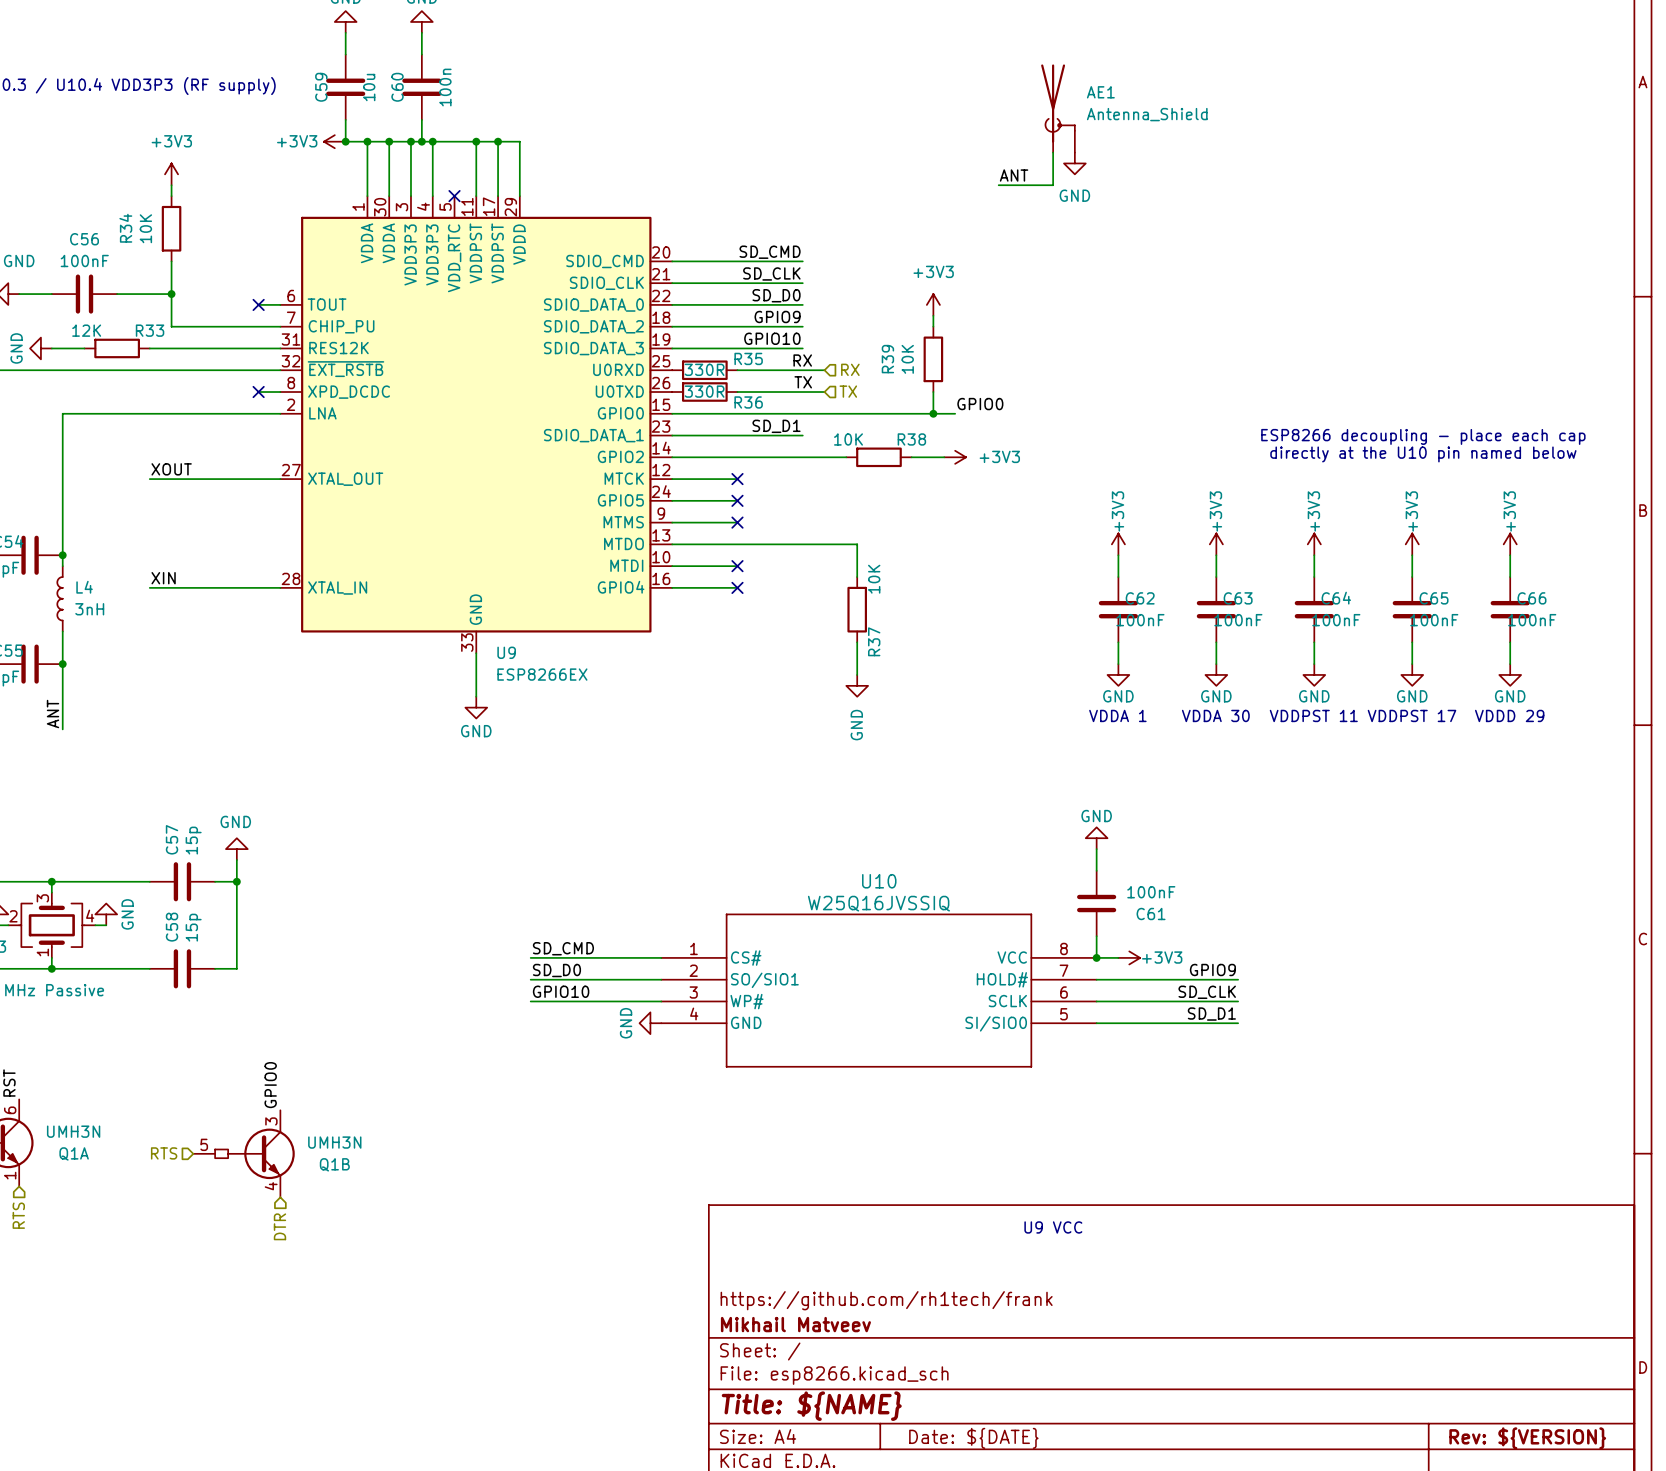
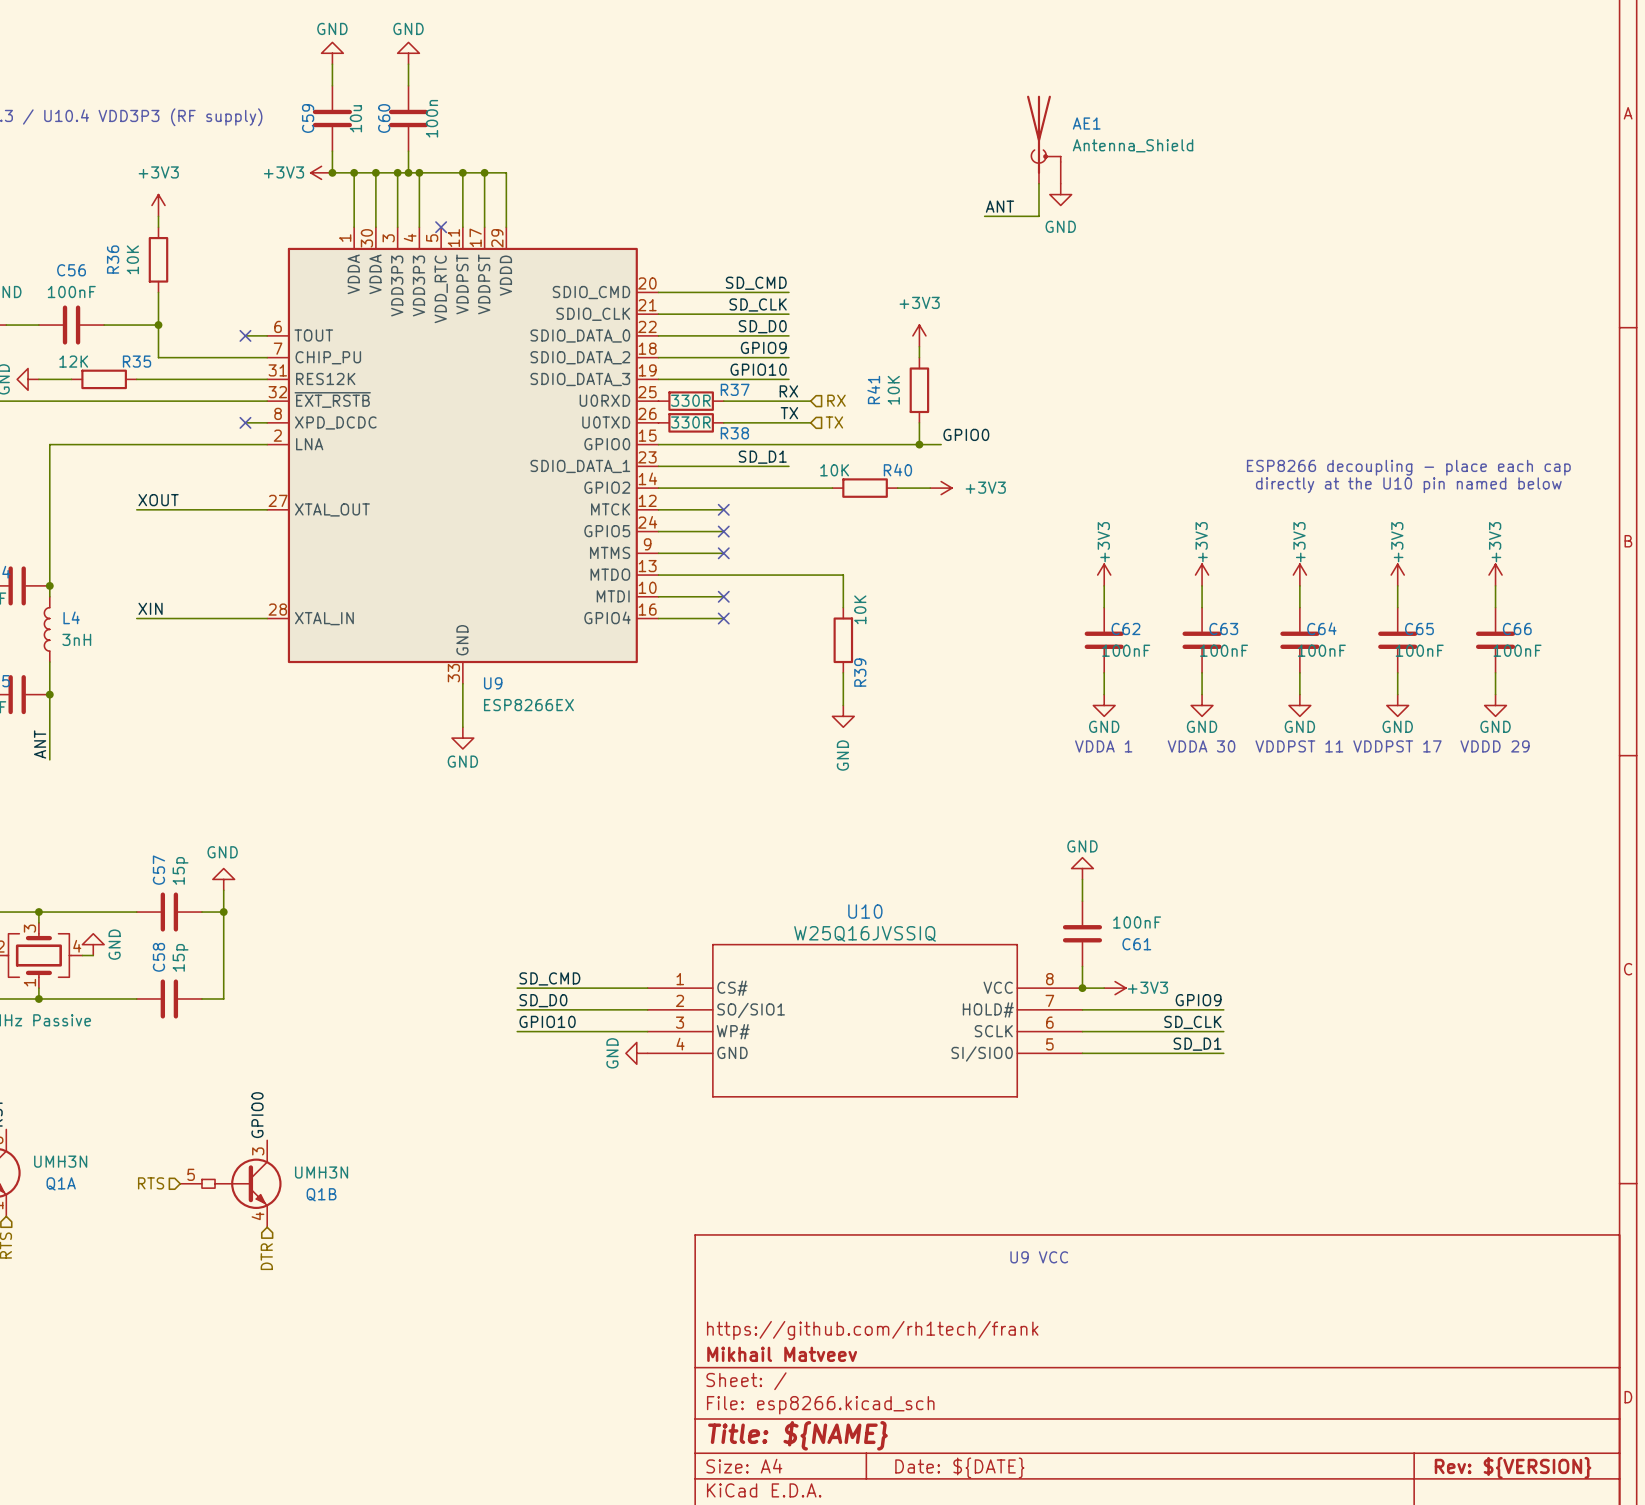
R34 name: R34 (125, 228) -> R36 (113, 259)
R33 name: R33 (150, 330) -> R35 (137, 361)
R35 name: R35 (748, 358) -> R37 (735, 389)
R39 name: R39 (887, 359) -> R41 (873, 389)
R36 name: R36 (748, 402) -> R38 (734, 433)
R38 name: R38 (911, 439) -> R40 (897, 470)
R37 name: R37 (874, 641) -> R39 (860, 672)

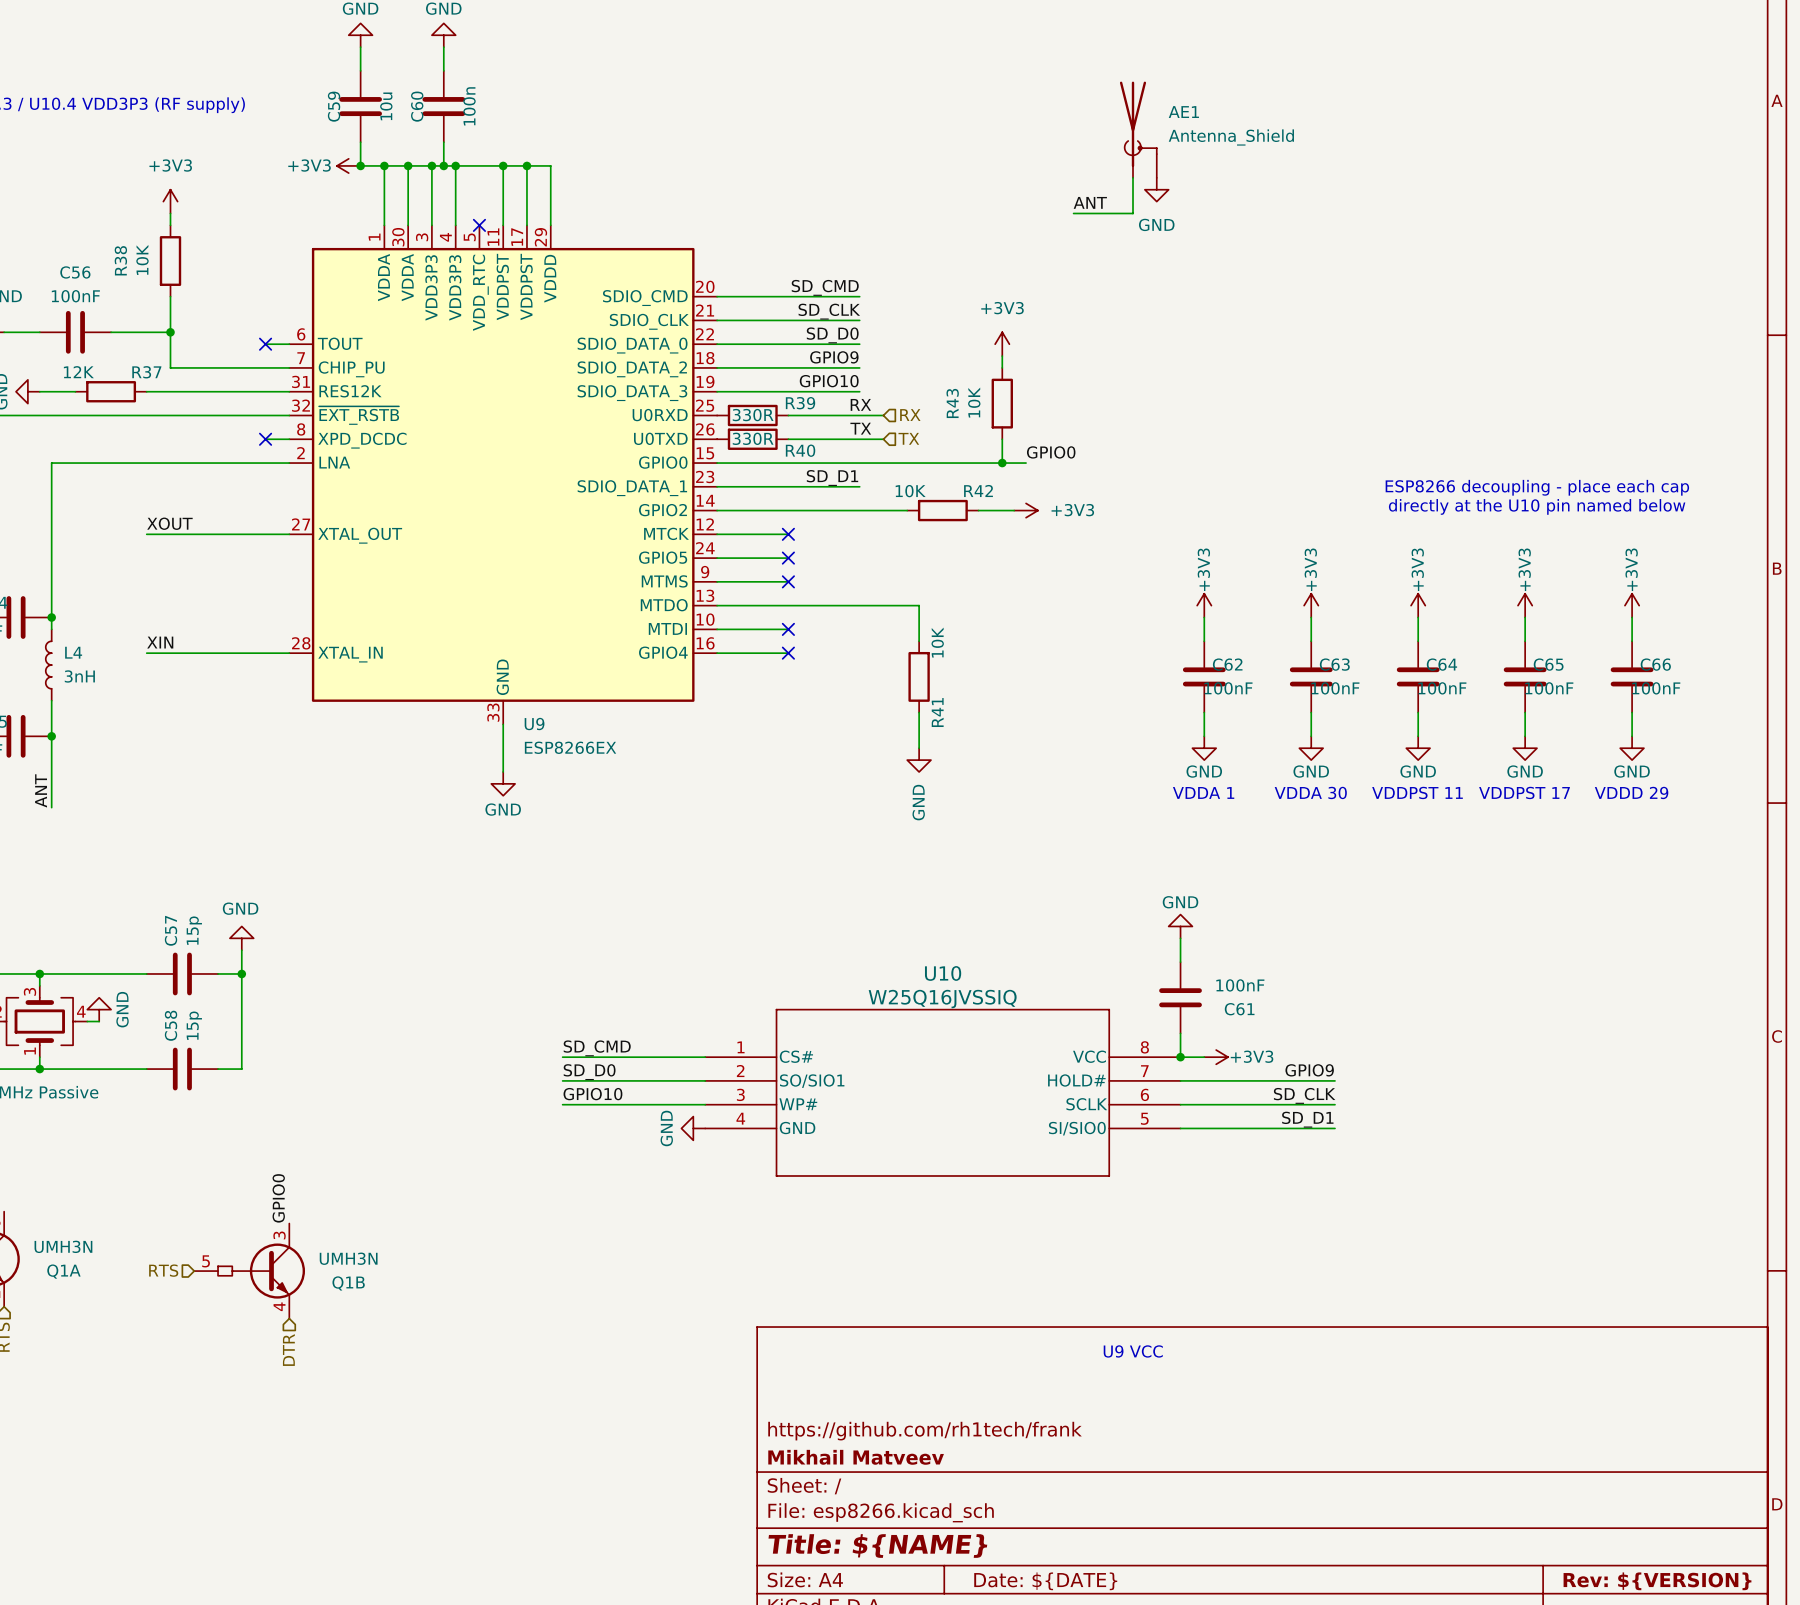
R36 name: R36 (113, 259) -> R38 (120, 260)
R35 name: R35 (137, 361) -> R37 (146, 372)
R37 name: R37 (735, 389) -> R39 (800, 403)
R41 name: R41 (873, 389) -> R43 (952, 403)
R38 name: R38 (734, 433) -> R40 (800, 450)
R40 name: R40 (897, 470) -> R42 (978, 490)
R39 name: R39 (860, 672) -> R41 (937, 712)

